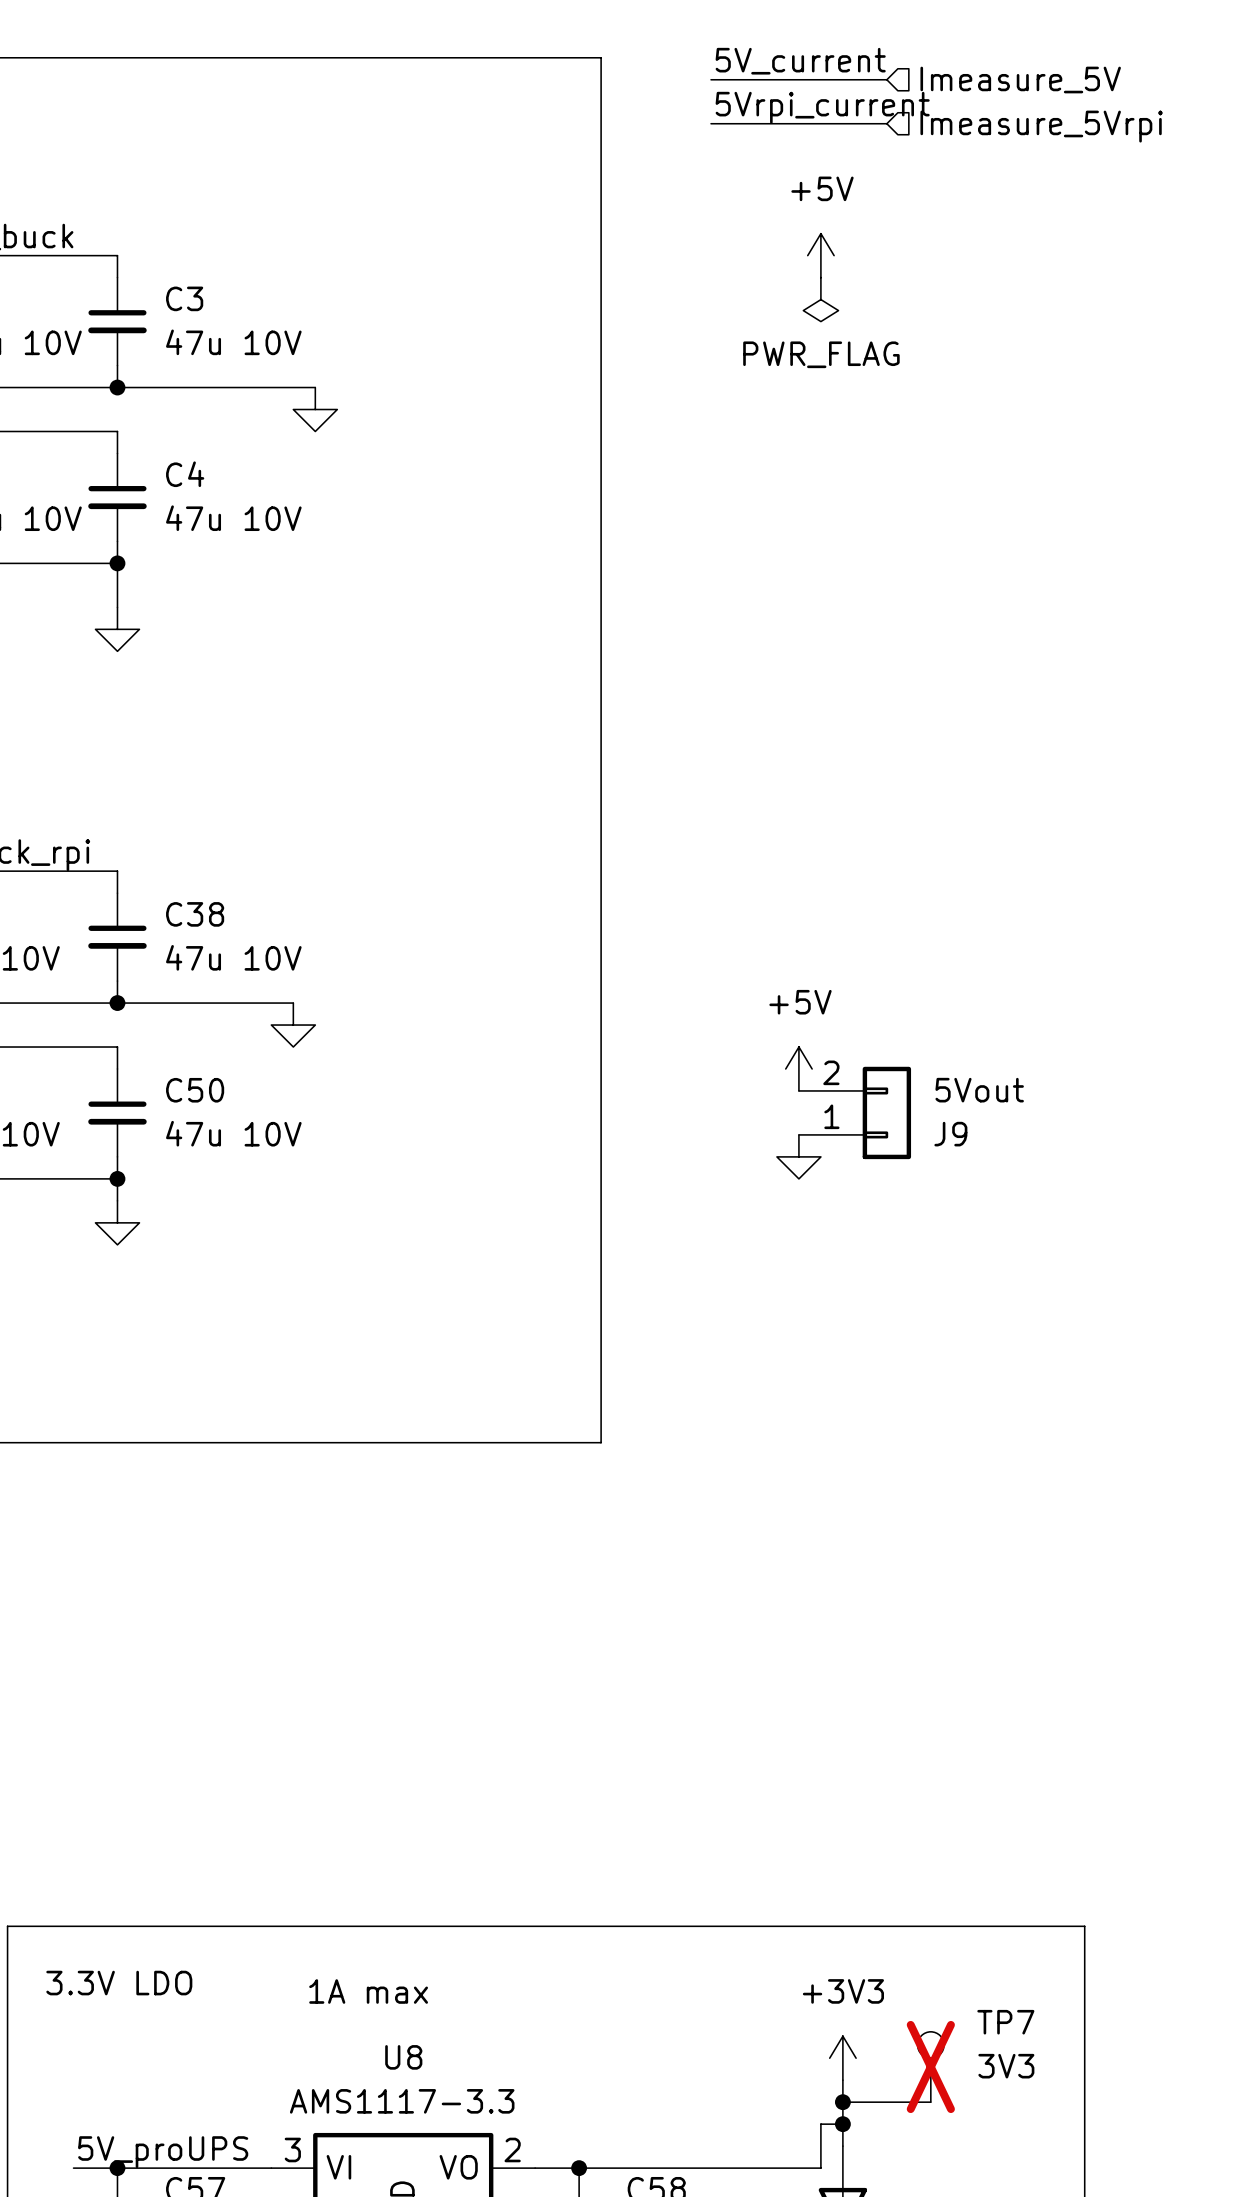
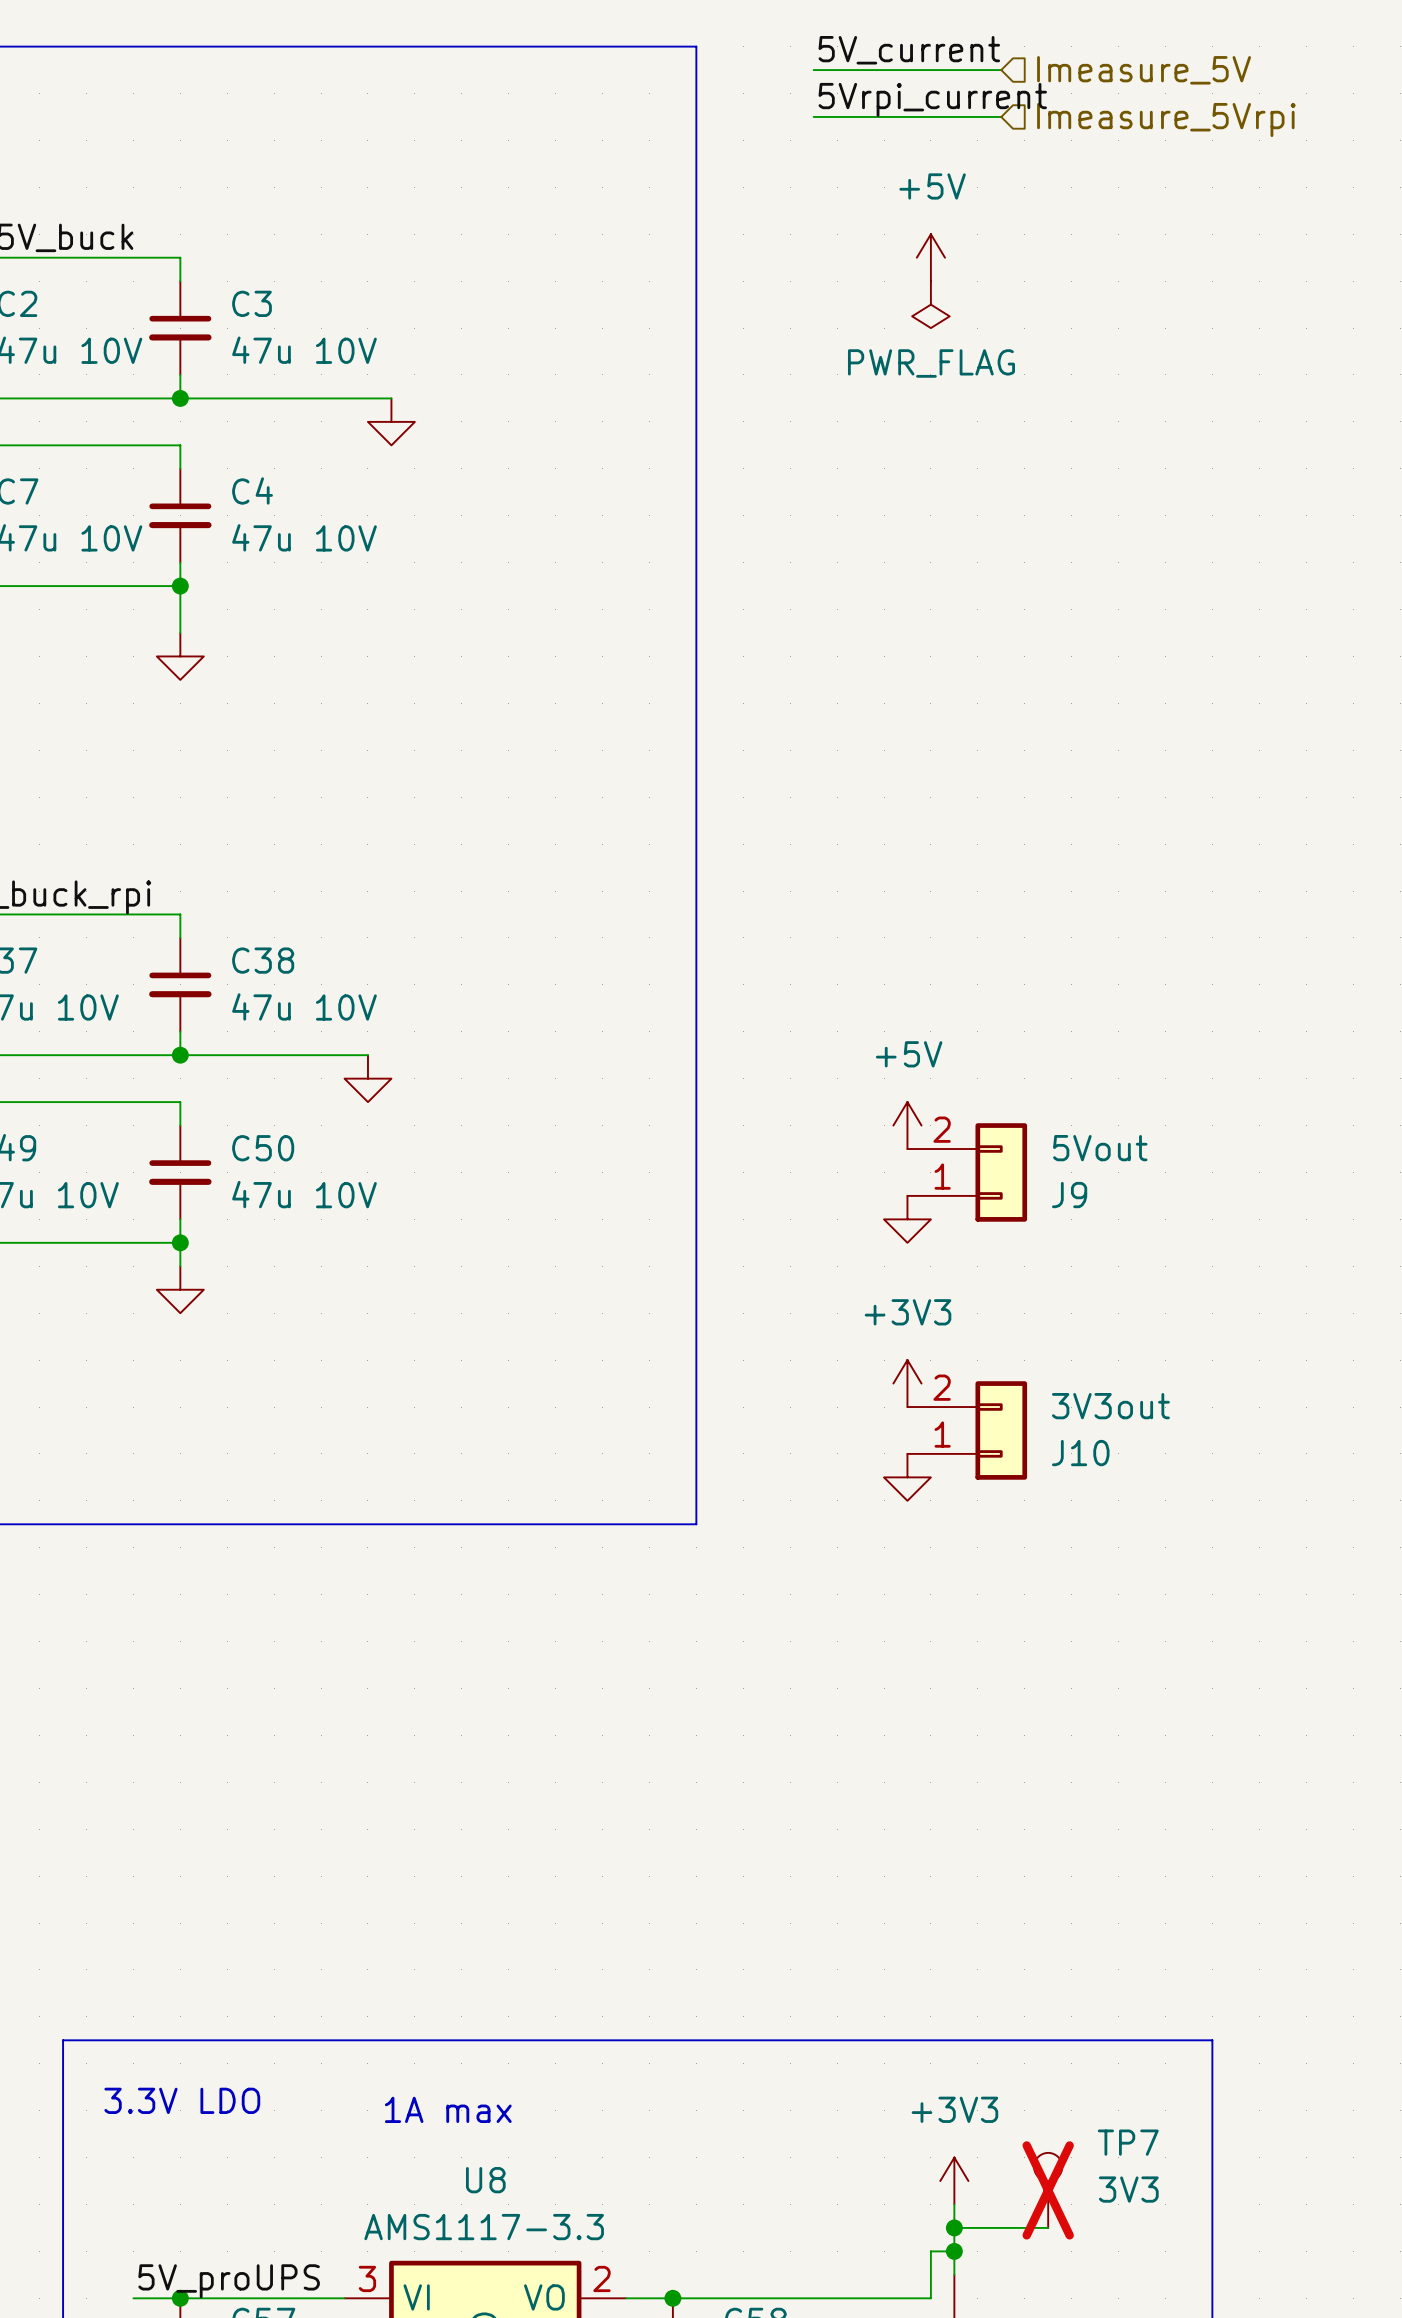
power symbol: none -> +3V3 (907, 1383)
J10: none -> 3V3out (967, 1430)
power symbol: none -> (907, 1477)

